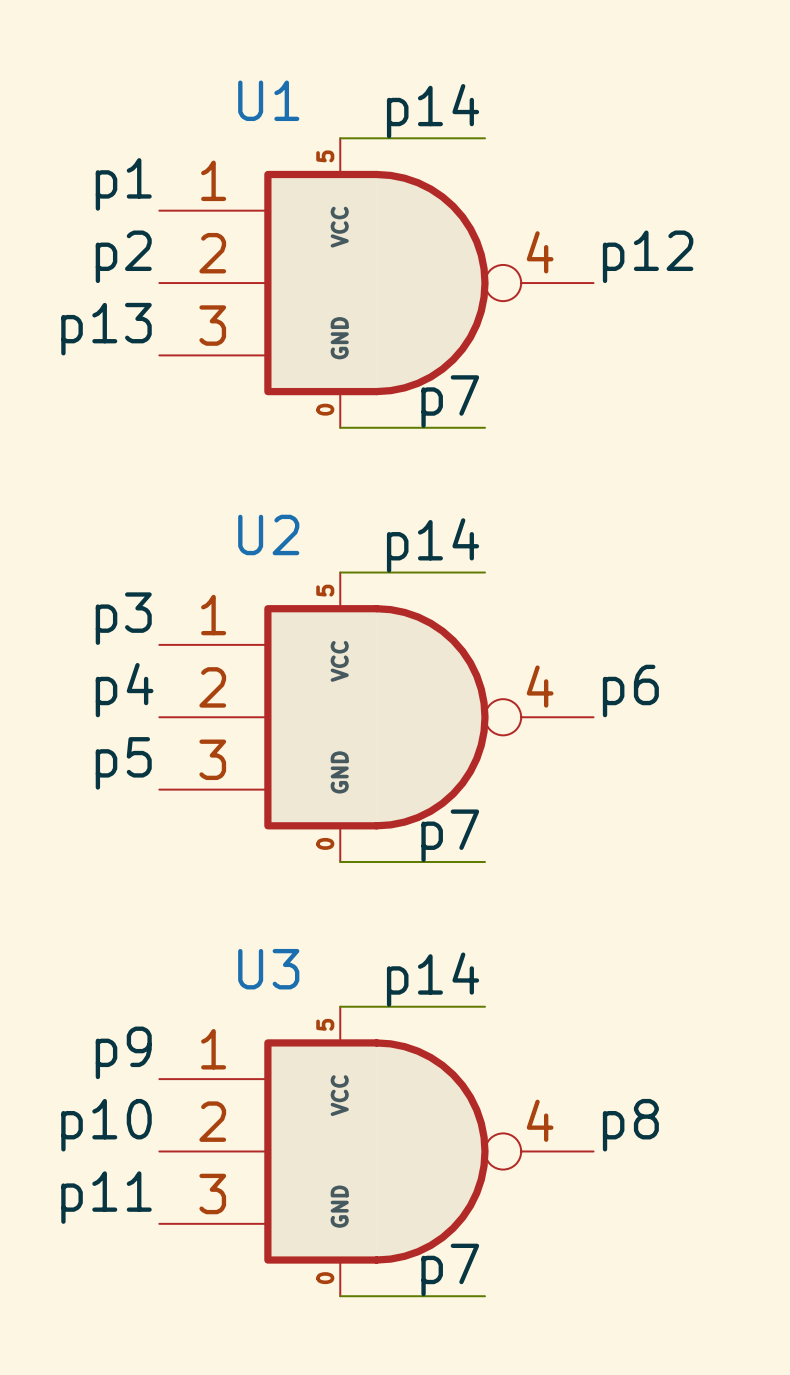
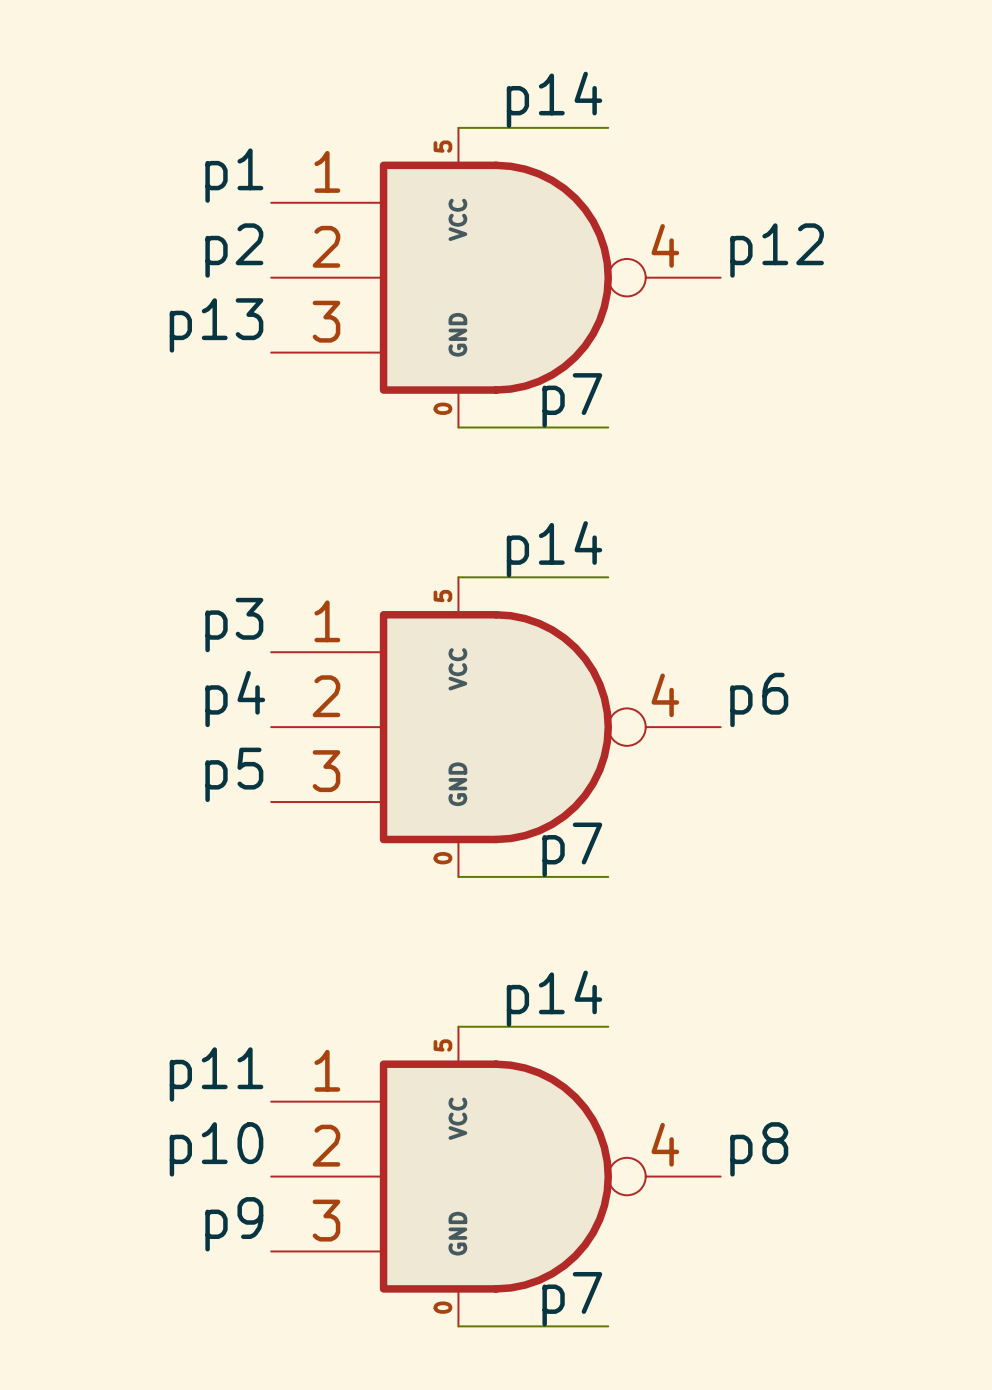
U1 name: U1 (268, 100) -> none
U2 name: U2 (268, 534) -> none
U3 name: U3 (268, 969) -> none
label: p9 (123, 1052) -> p11 (216, 1074)
label: p11 (106, 1197) -> p9 (234, 1224)

